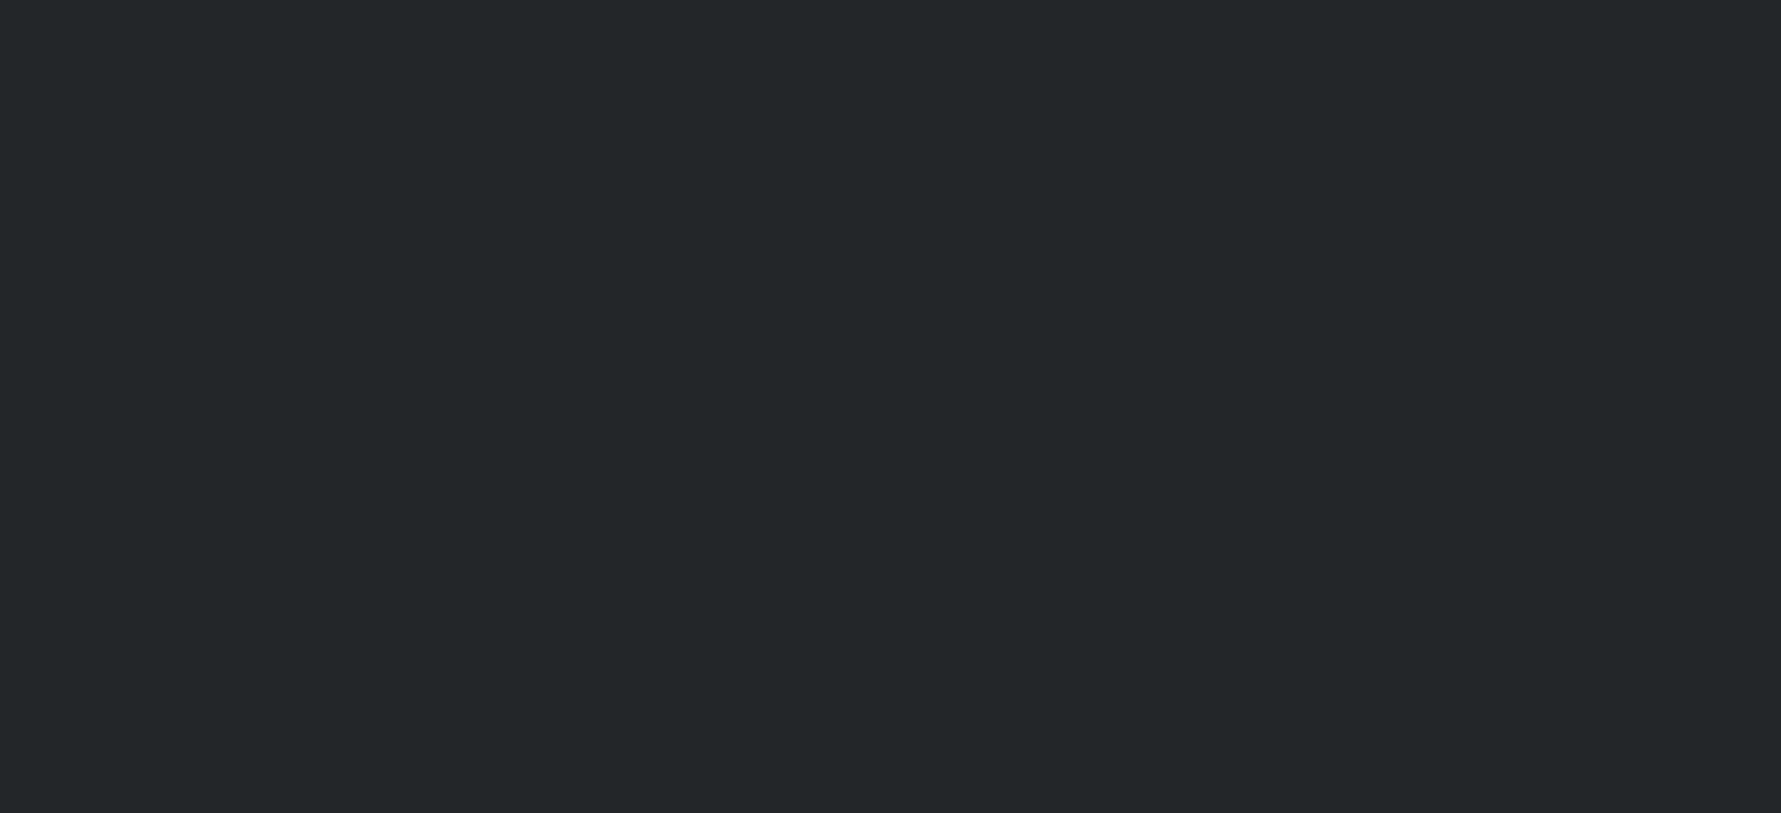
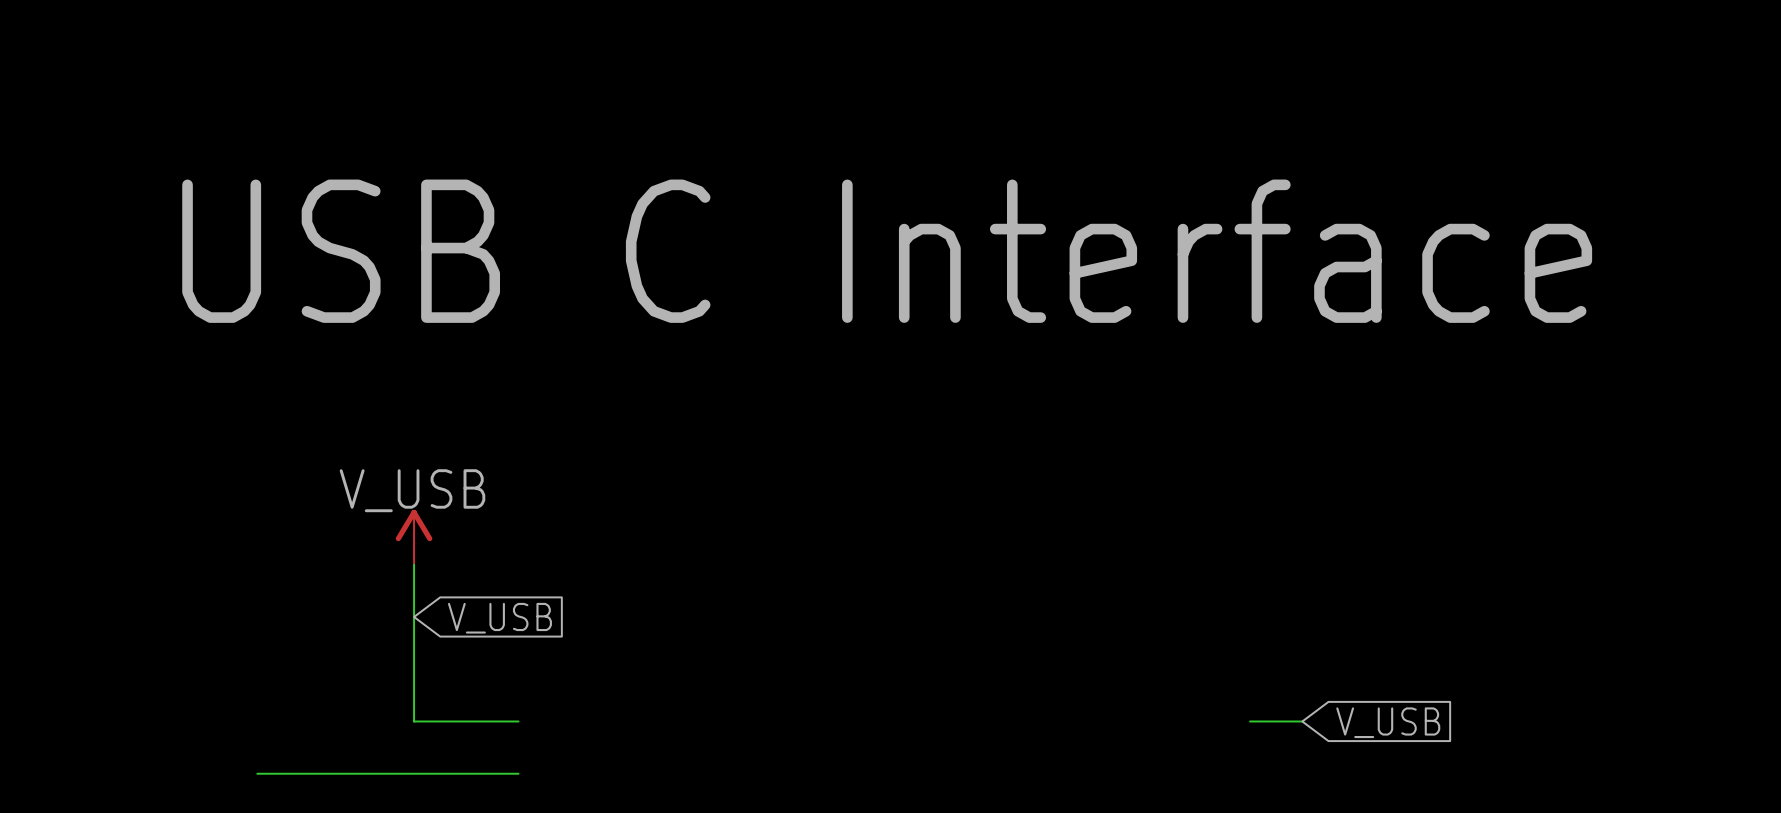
text: none -> USB C Interface (887, 251)
power symbol: none -> V_USB (414, 537)
wire: none -> (414, 564) (414, 721) (518, 721)
global label: none -> V_USB (499, 618)
wire: none -> (1250, 721) (1302, 721)
global label: none -> V_USB (1388, 722)
wire: none -> (257, 773) (518, 773)

